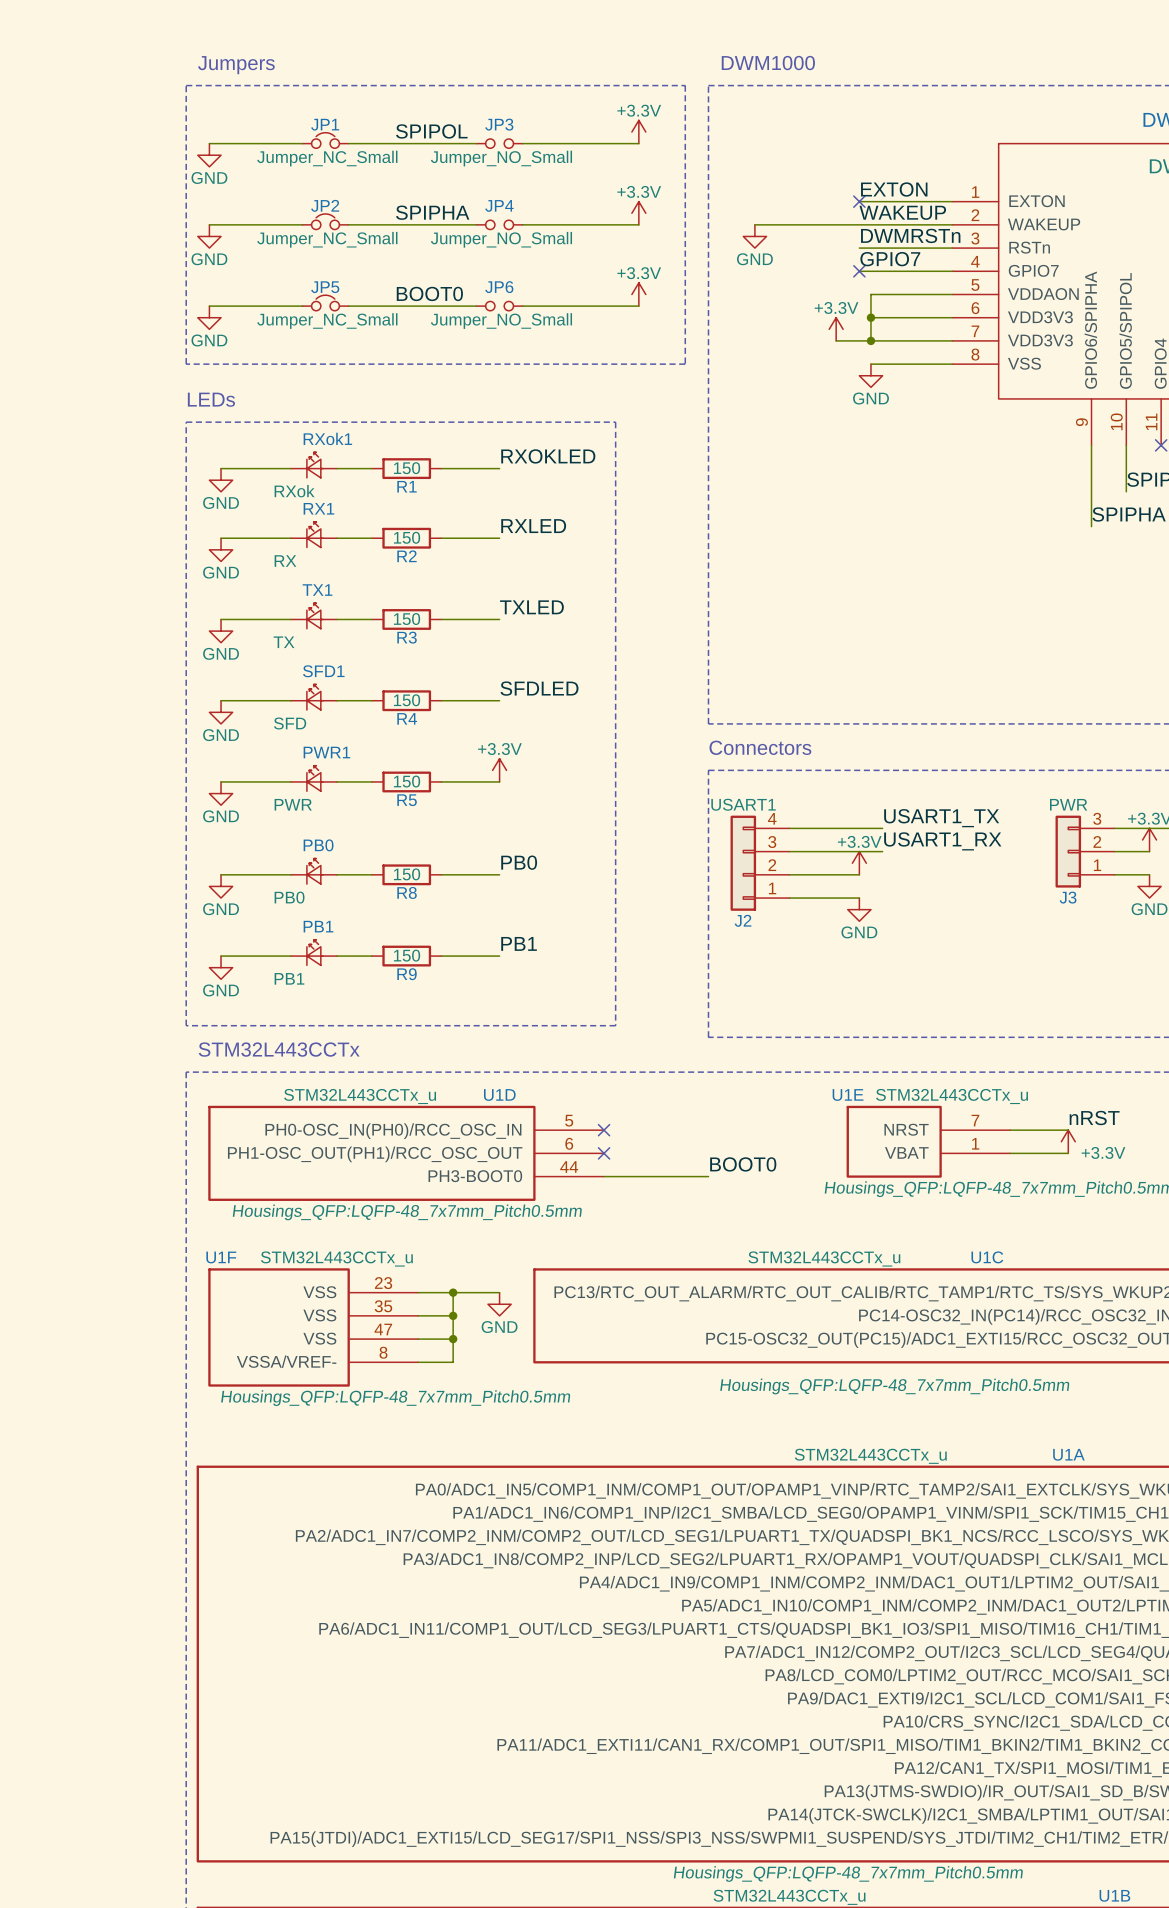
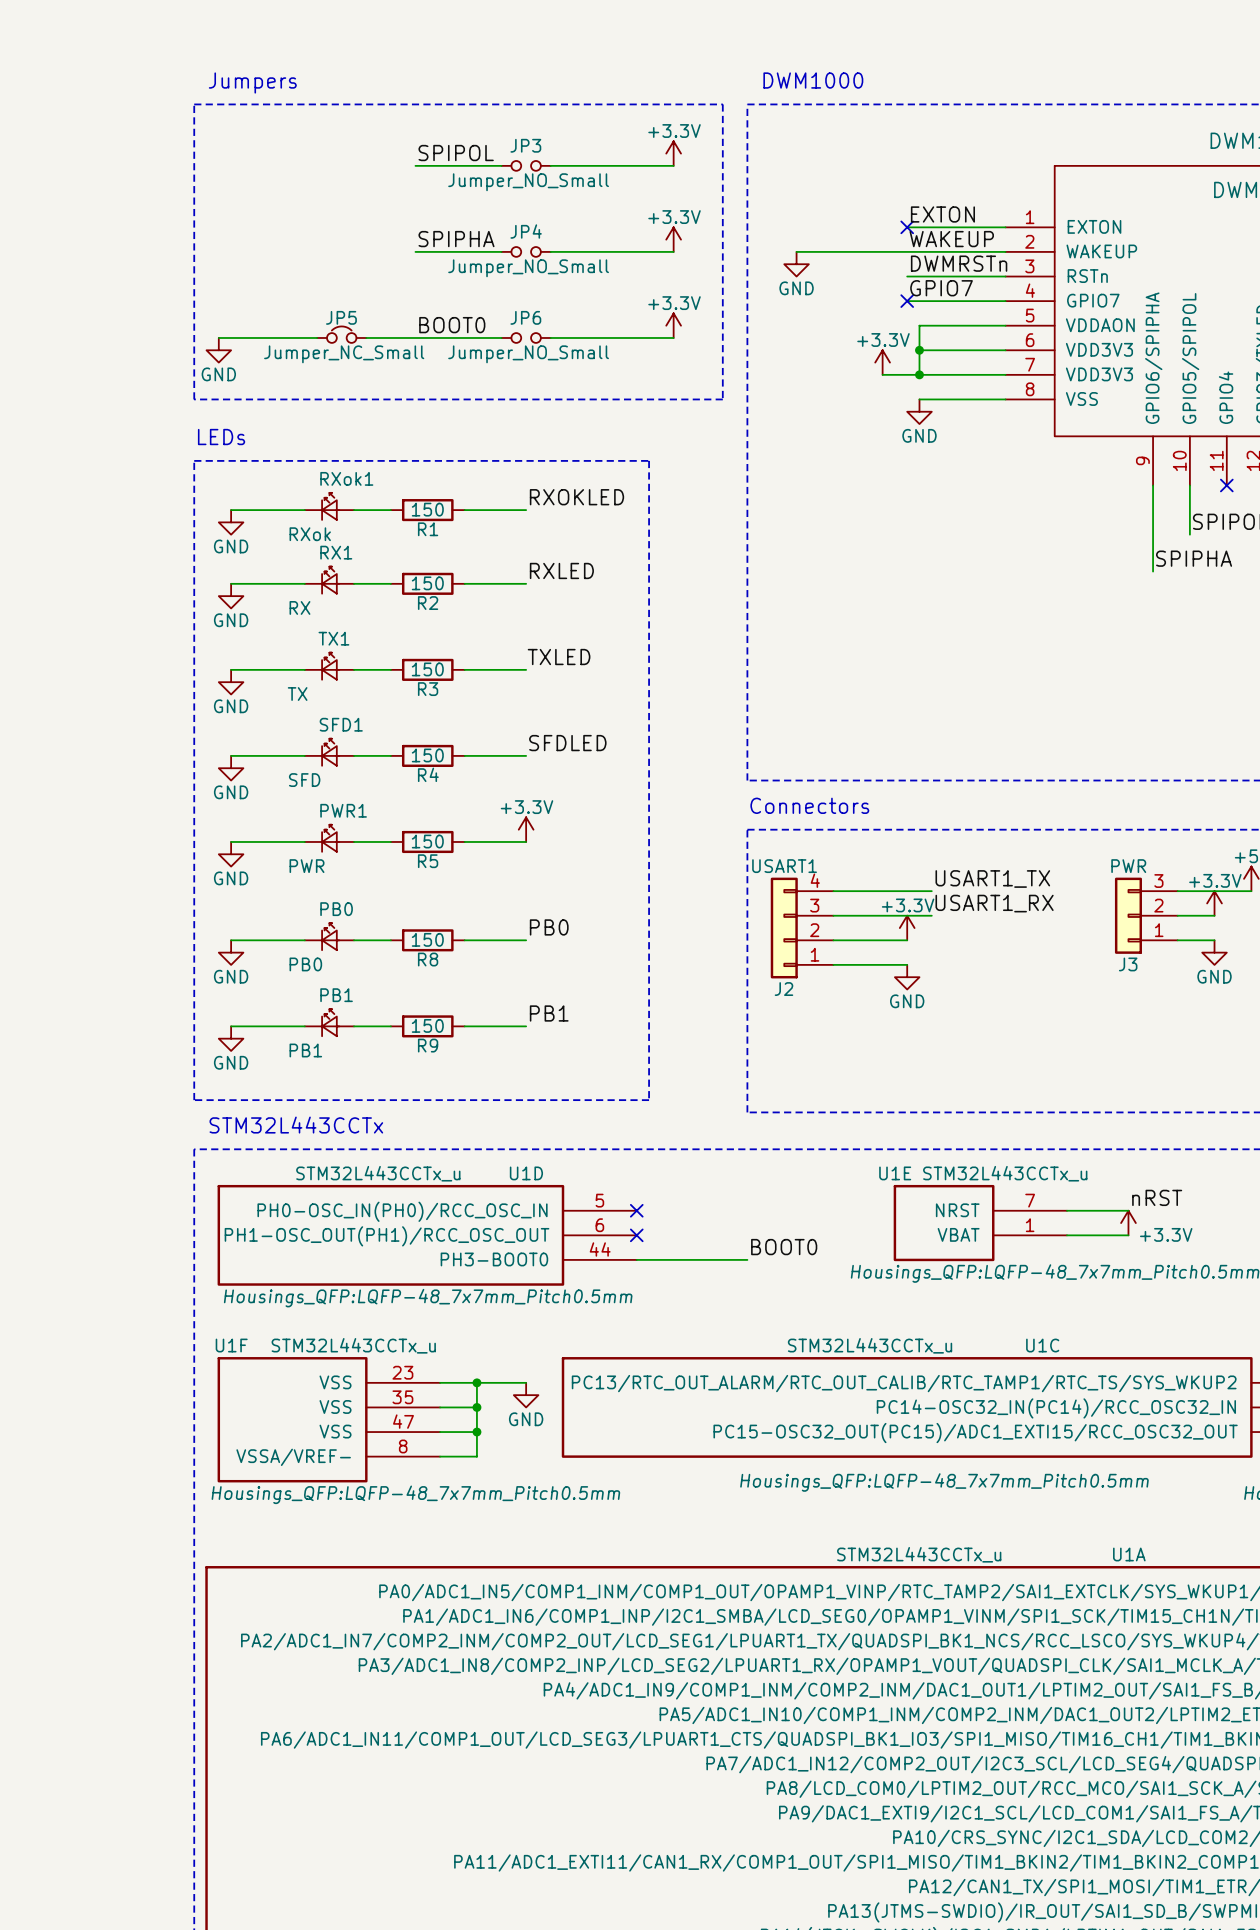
JP1: Jumper_NC_Small (325, 140) -> none
wire: (209, 143) (302, 143) -> none
wire: (348, 143) (395, 143) -> none
power symbol: GND (209, 155) -> none
JP2: Jumper_NC_Small (325, 221) -> none
wire: (209, 224) (302, 224) -> none
wire: (348, 224) (395, 224) -> none
power symbol: GND (209, 236) -> none

